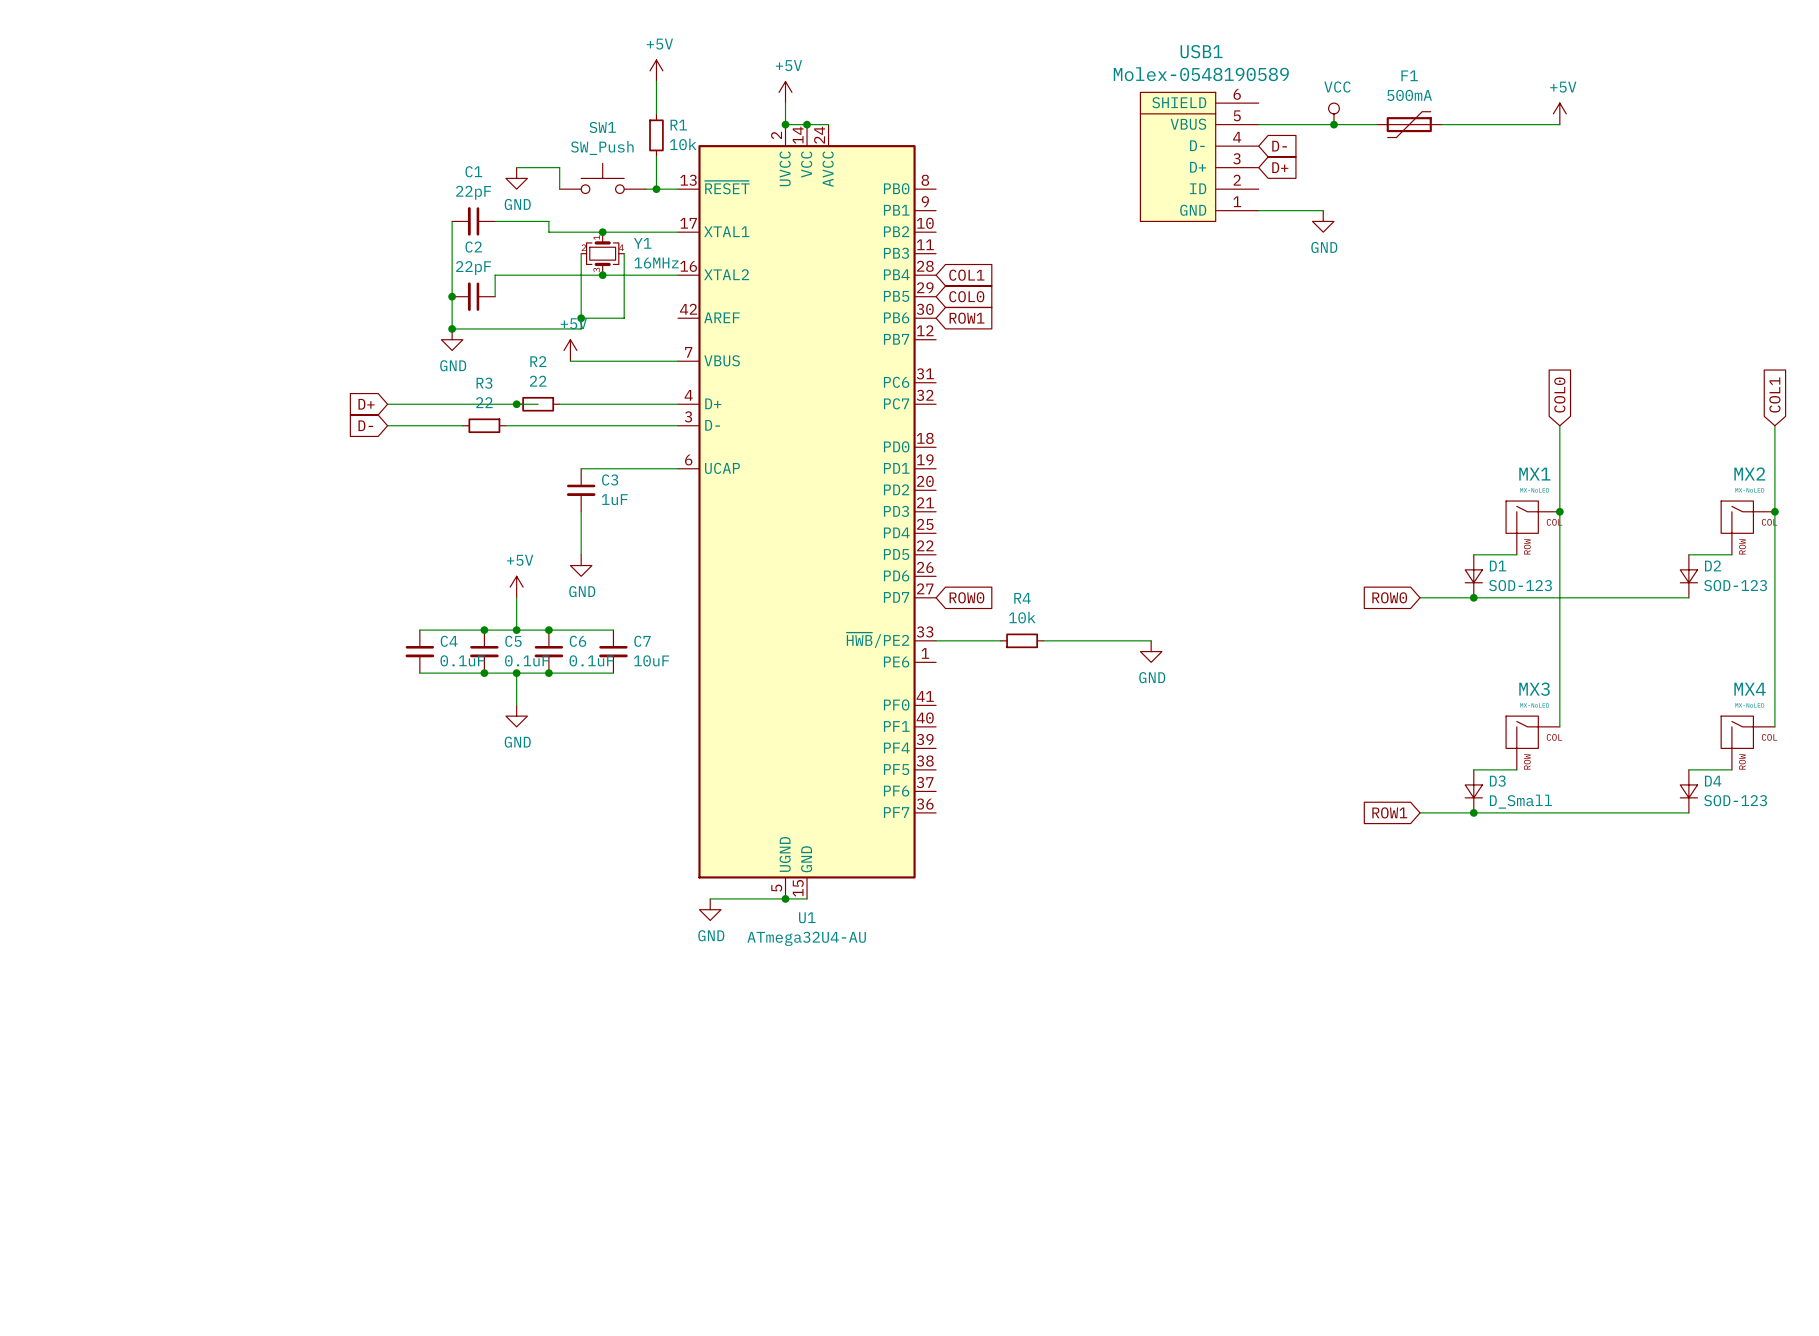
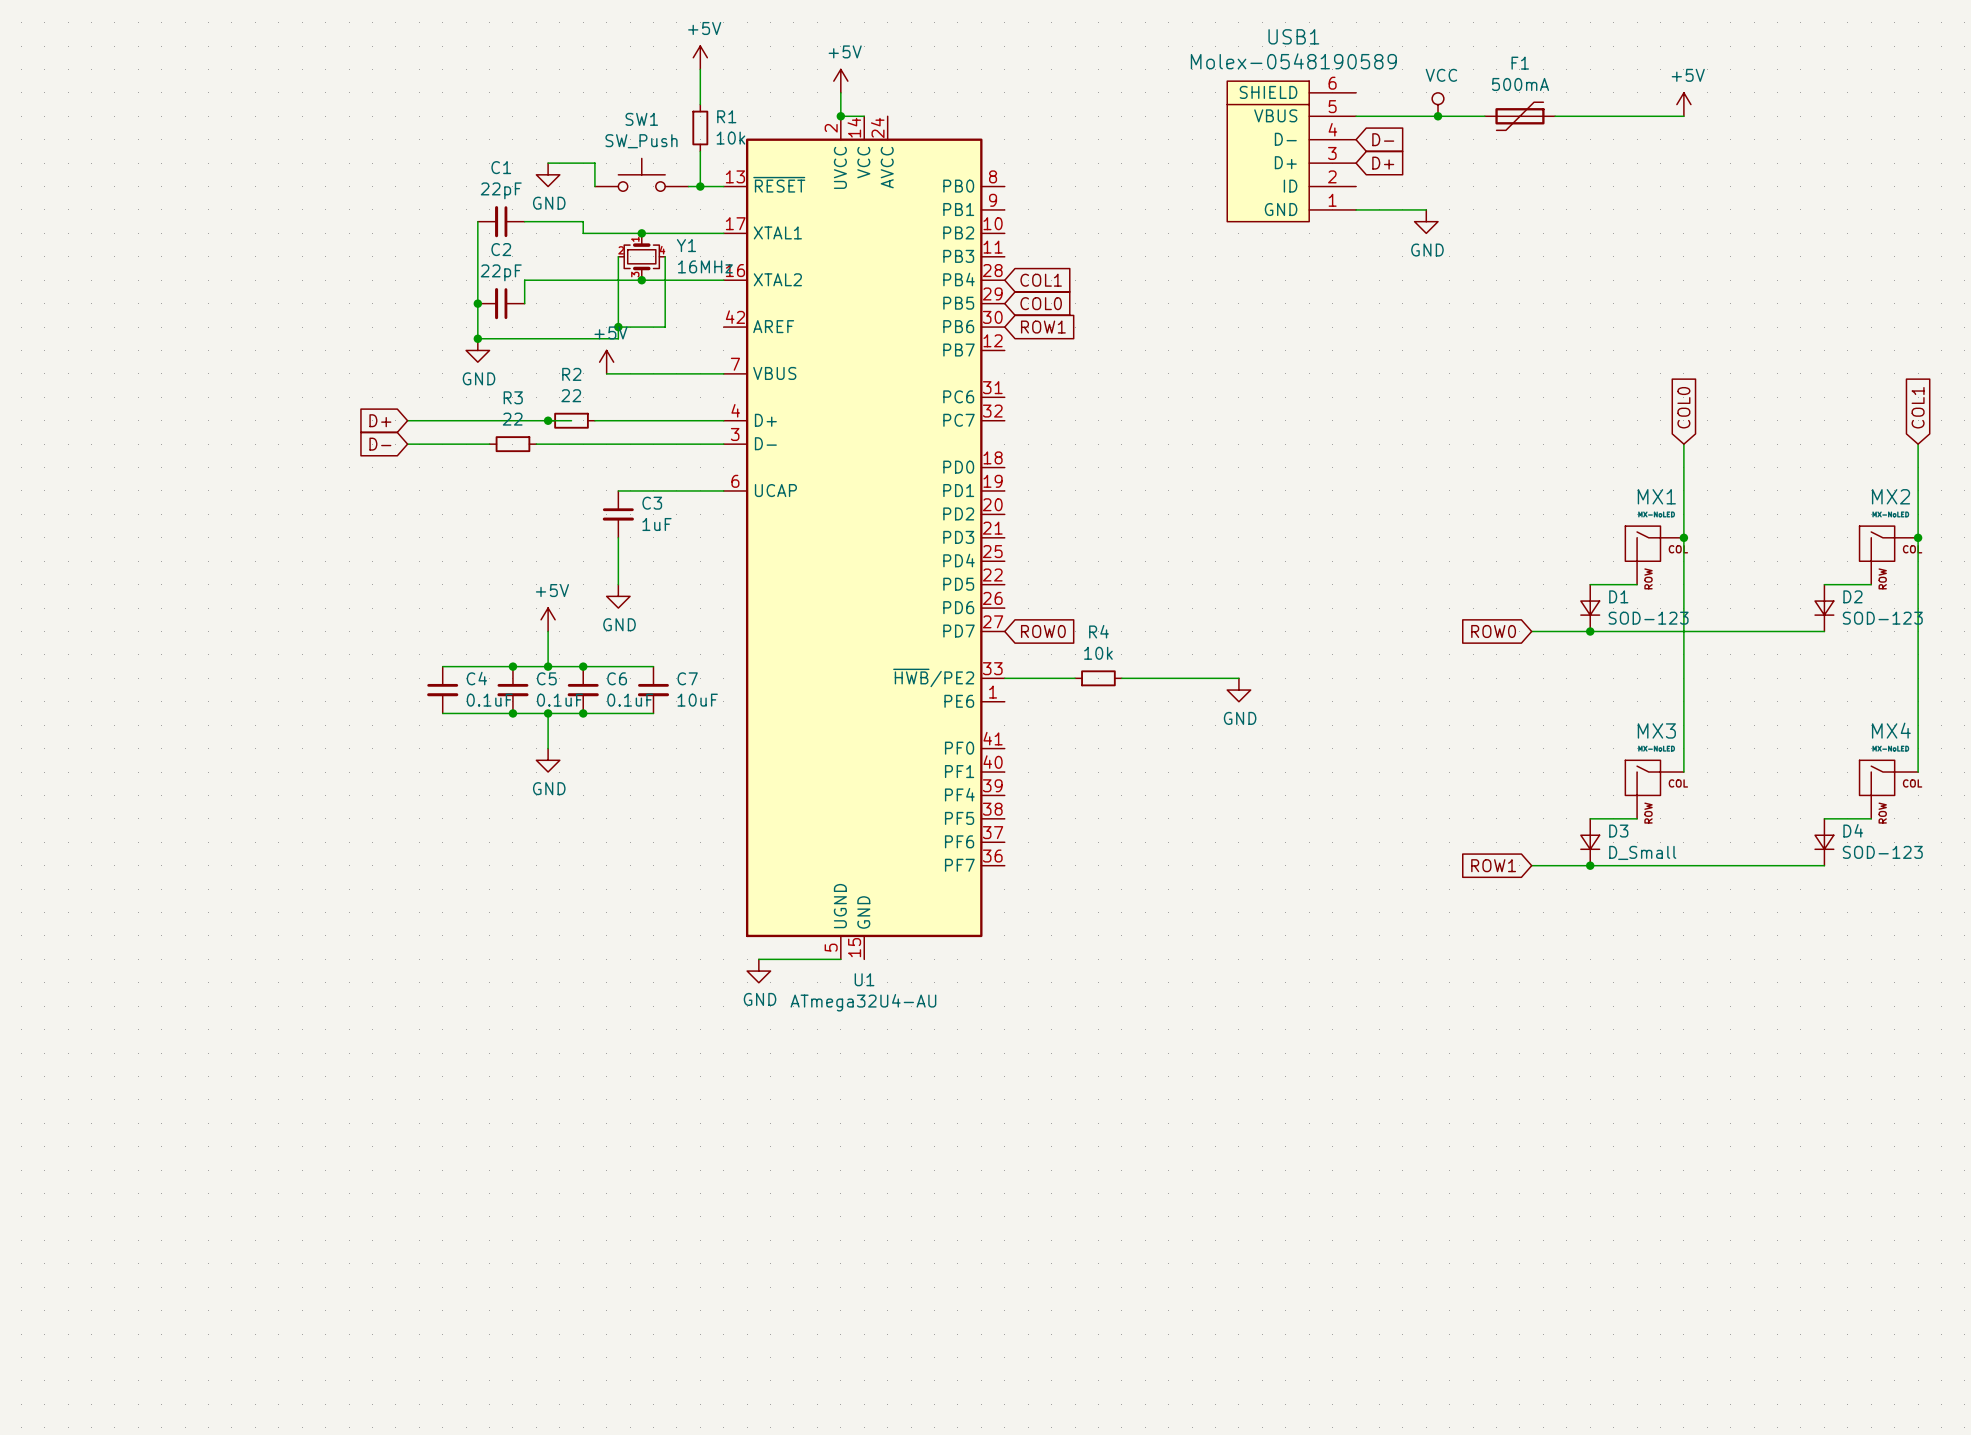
wire: (807, 124) (828, 124) -> none
junction: (807, 124) -> none
wire: (785, 898) (807, 898) -> none
junction: (785, 898) -> none

